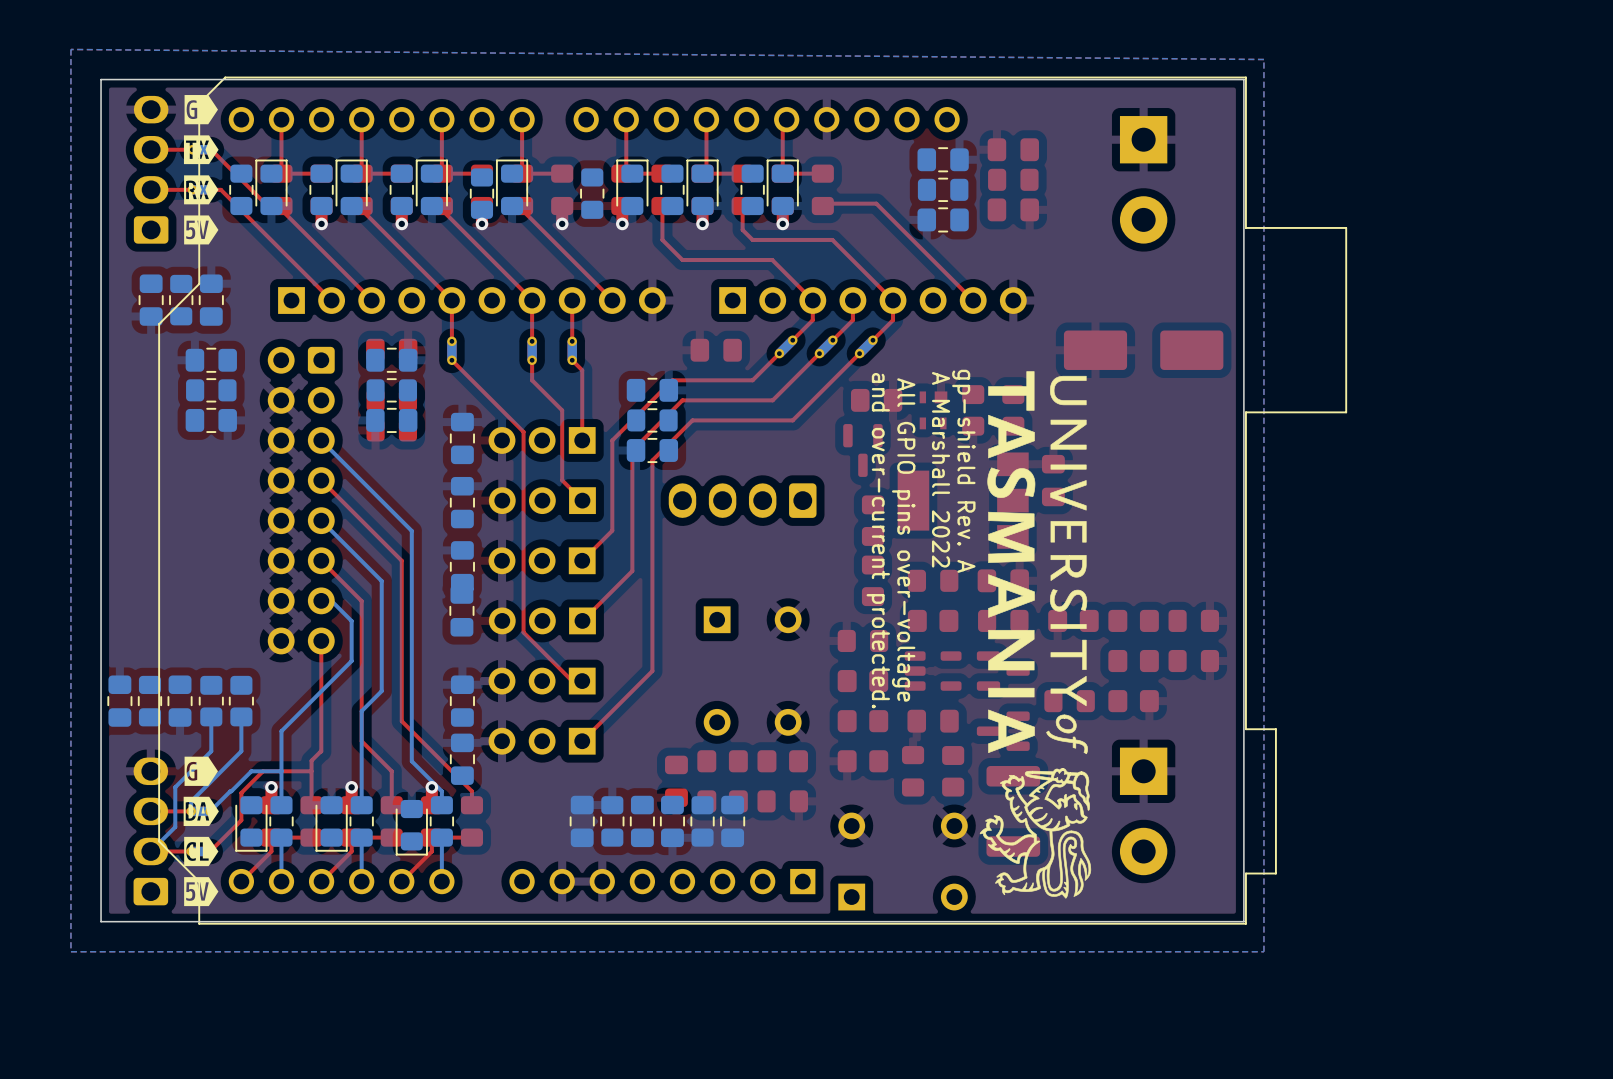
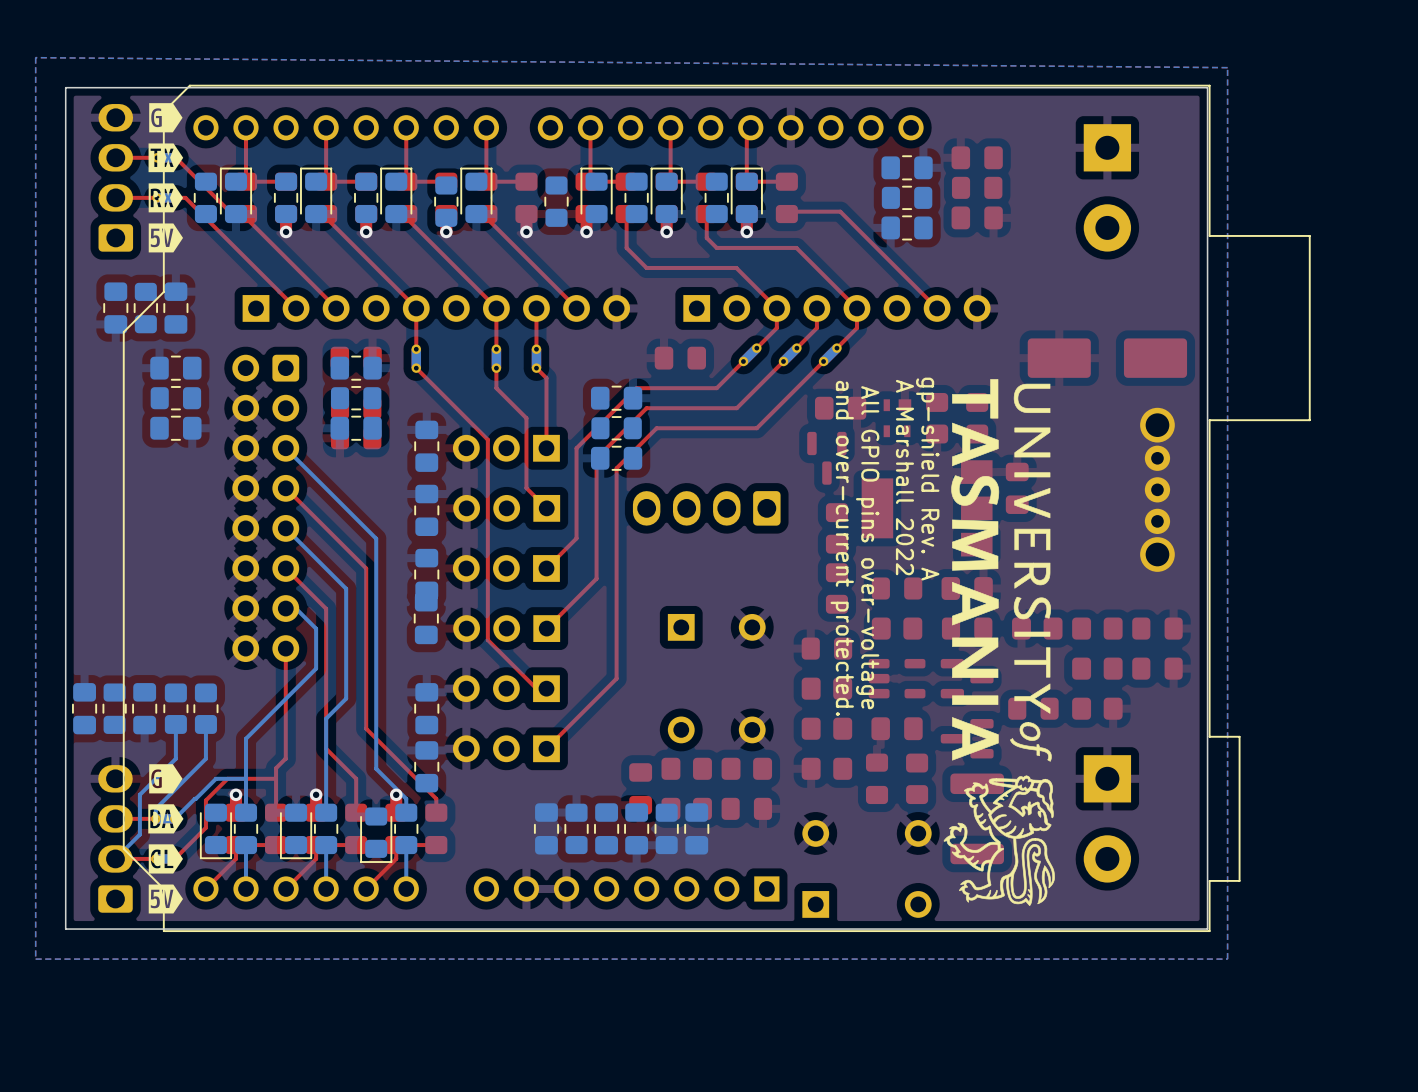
part: none -> (1157, 489)

